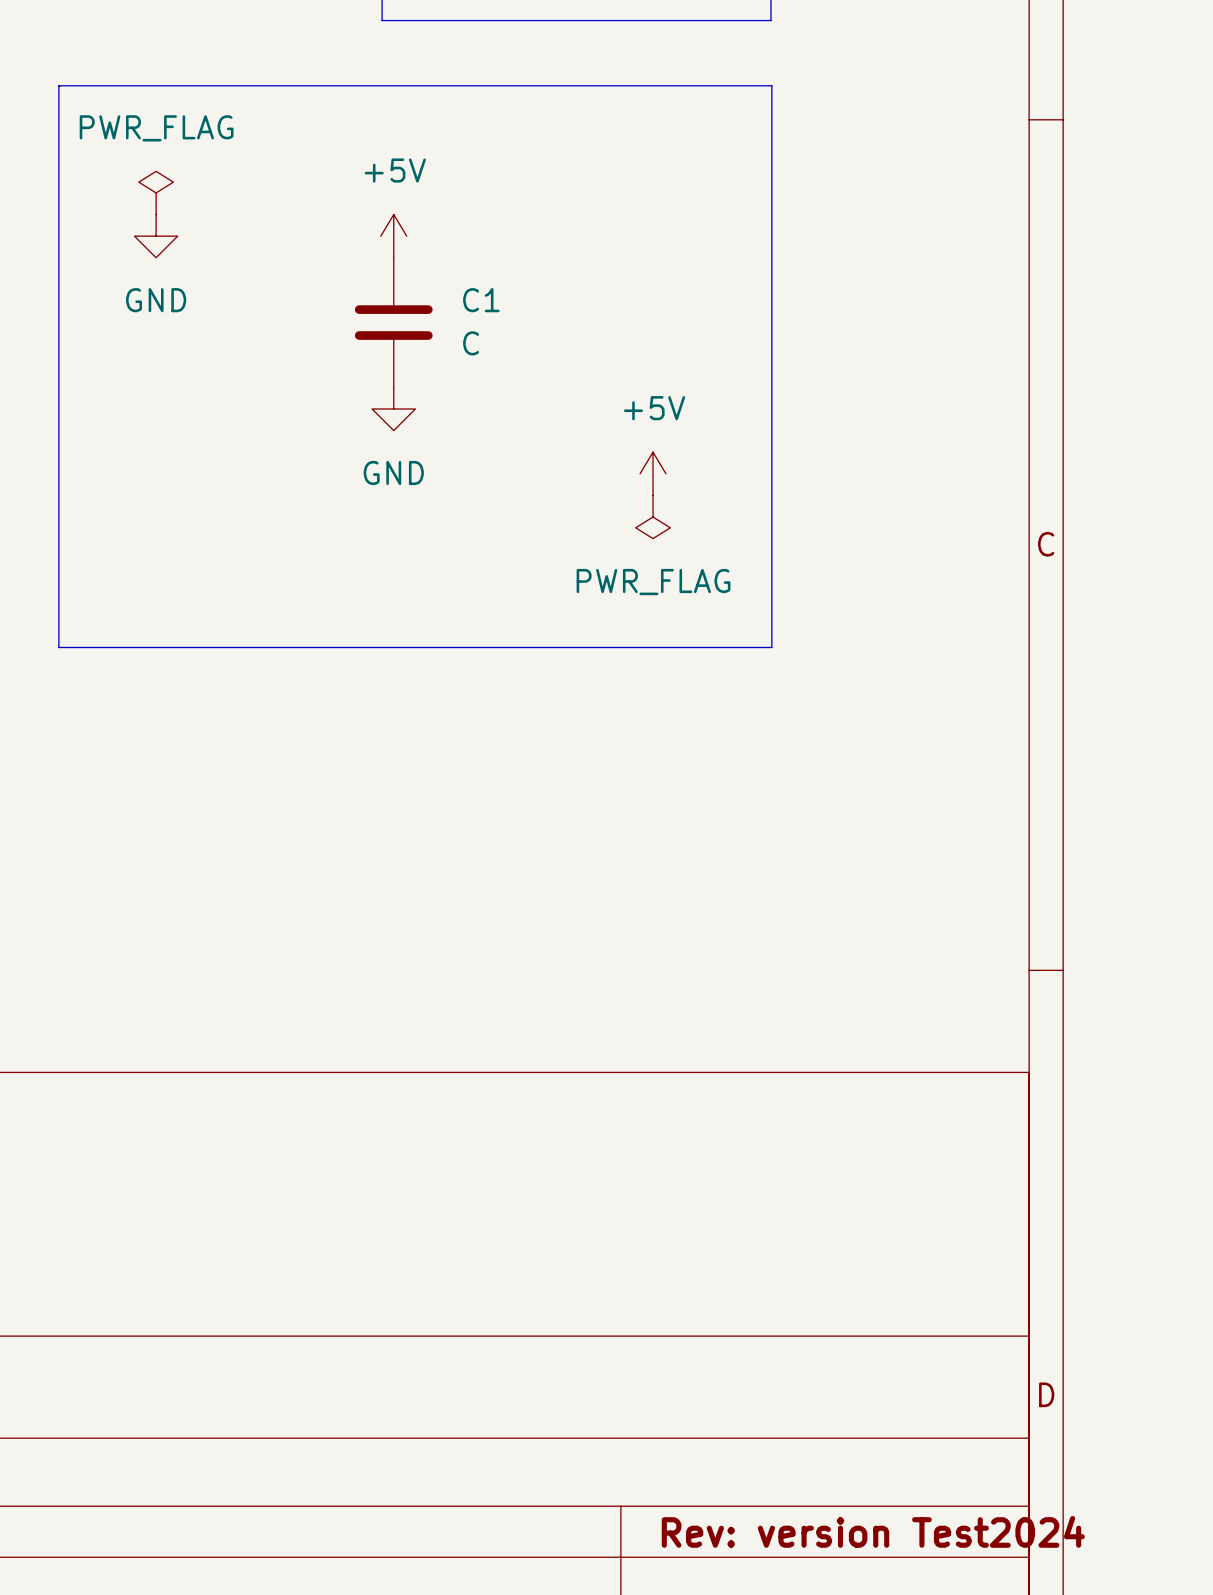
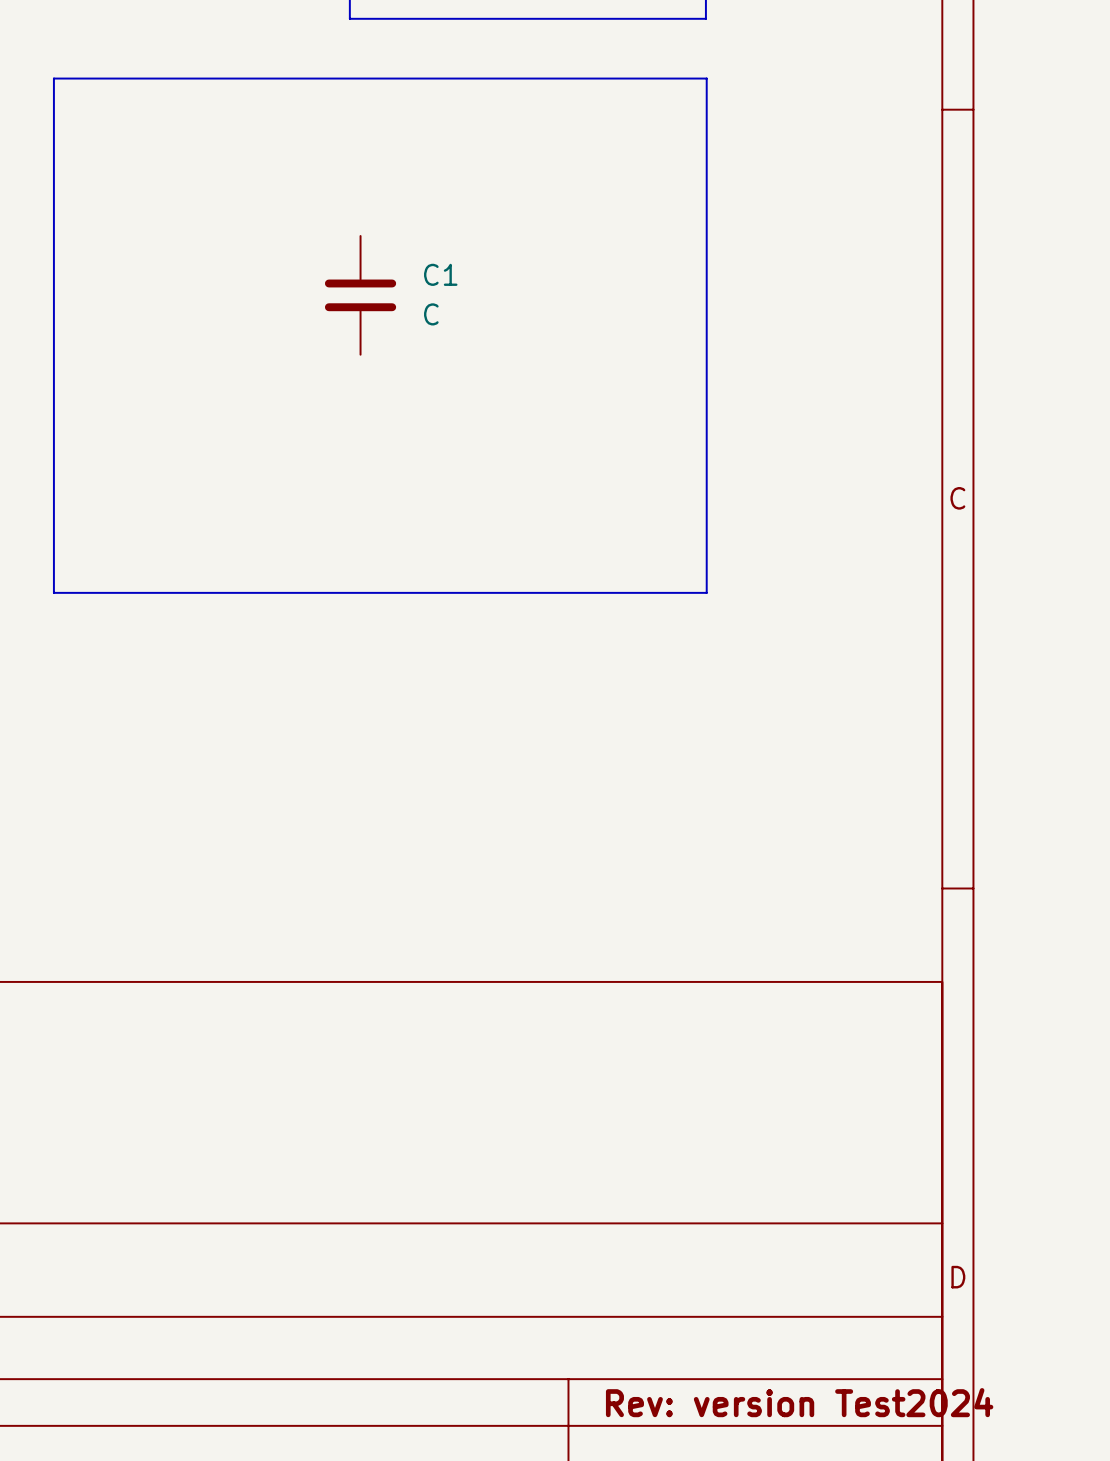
power symbol: PWR_FLAG (156, 192) -> none
power symbol: GND (156, 236) -> none
power symbol: +5V (393, 236) -> none
power symbol: GND (393, 408) -> none
power symbol: +5V (653, 473) -> none
power symbol: PWR_FLAG (653, 517) -> none

